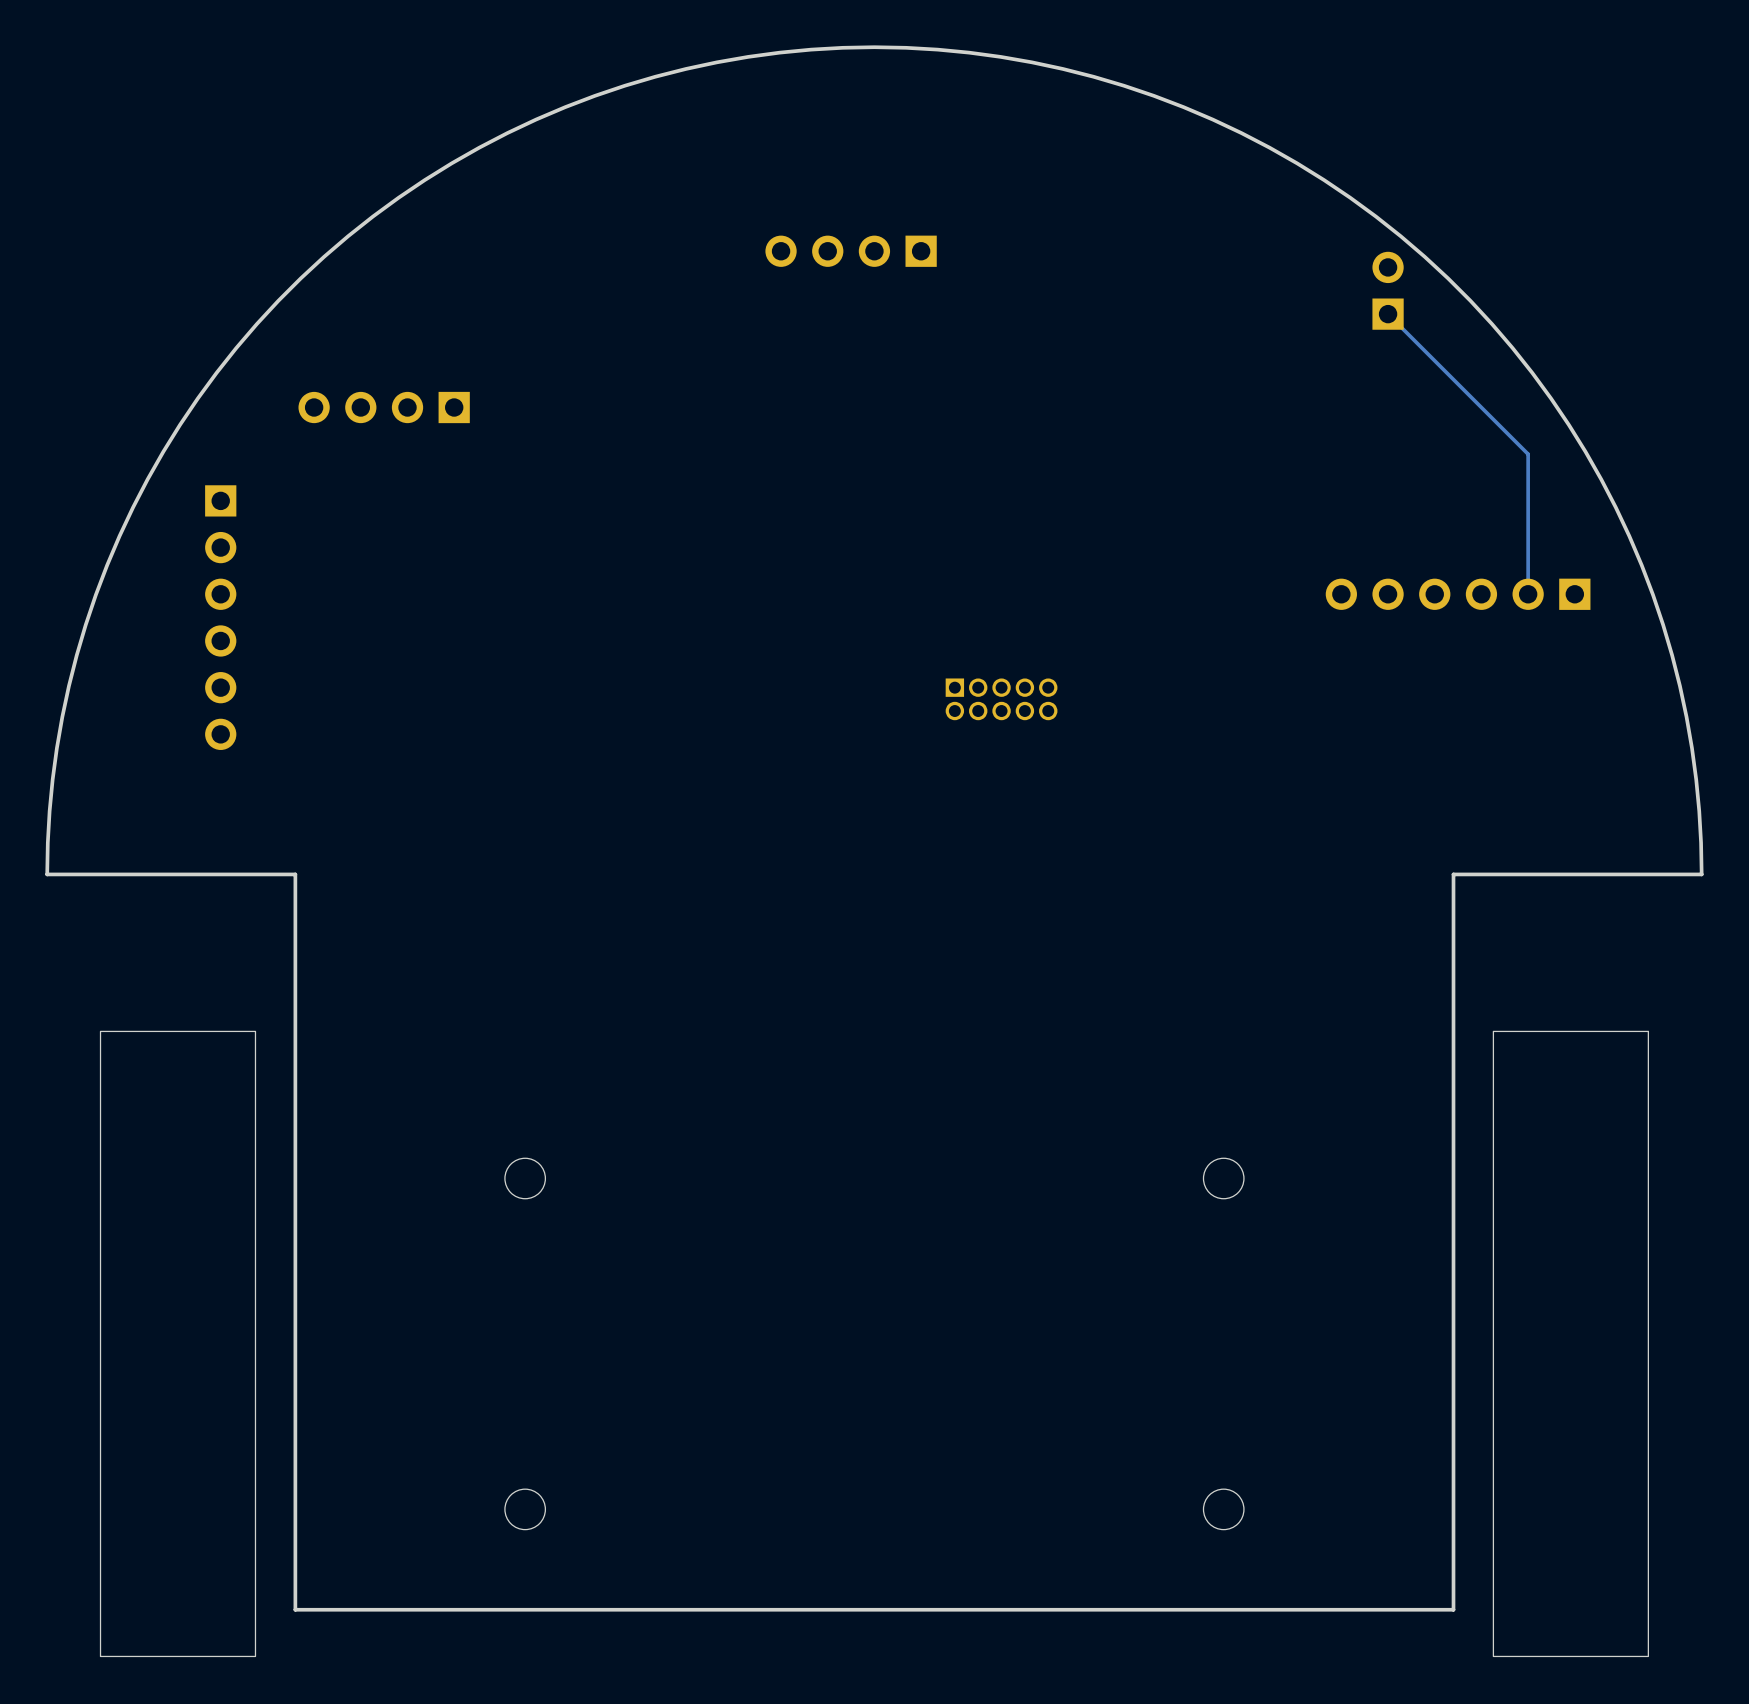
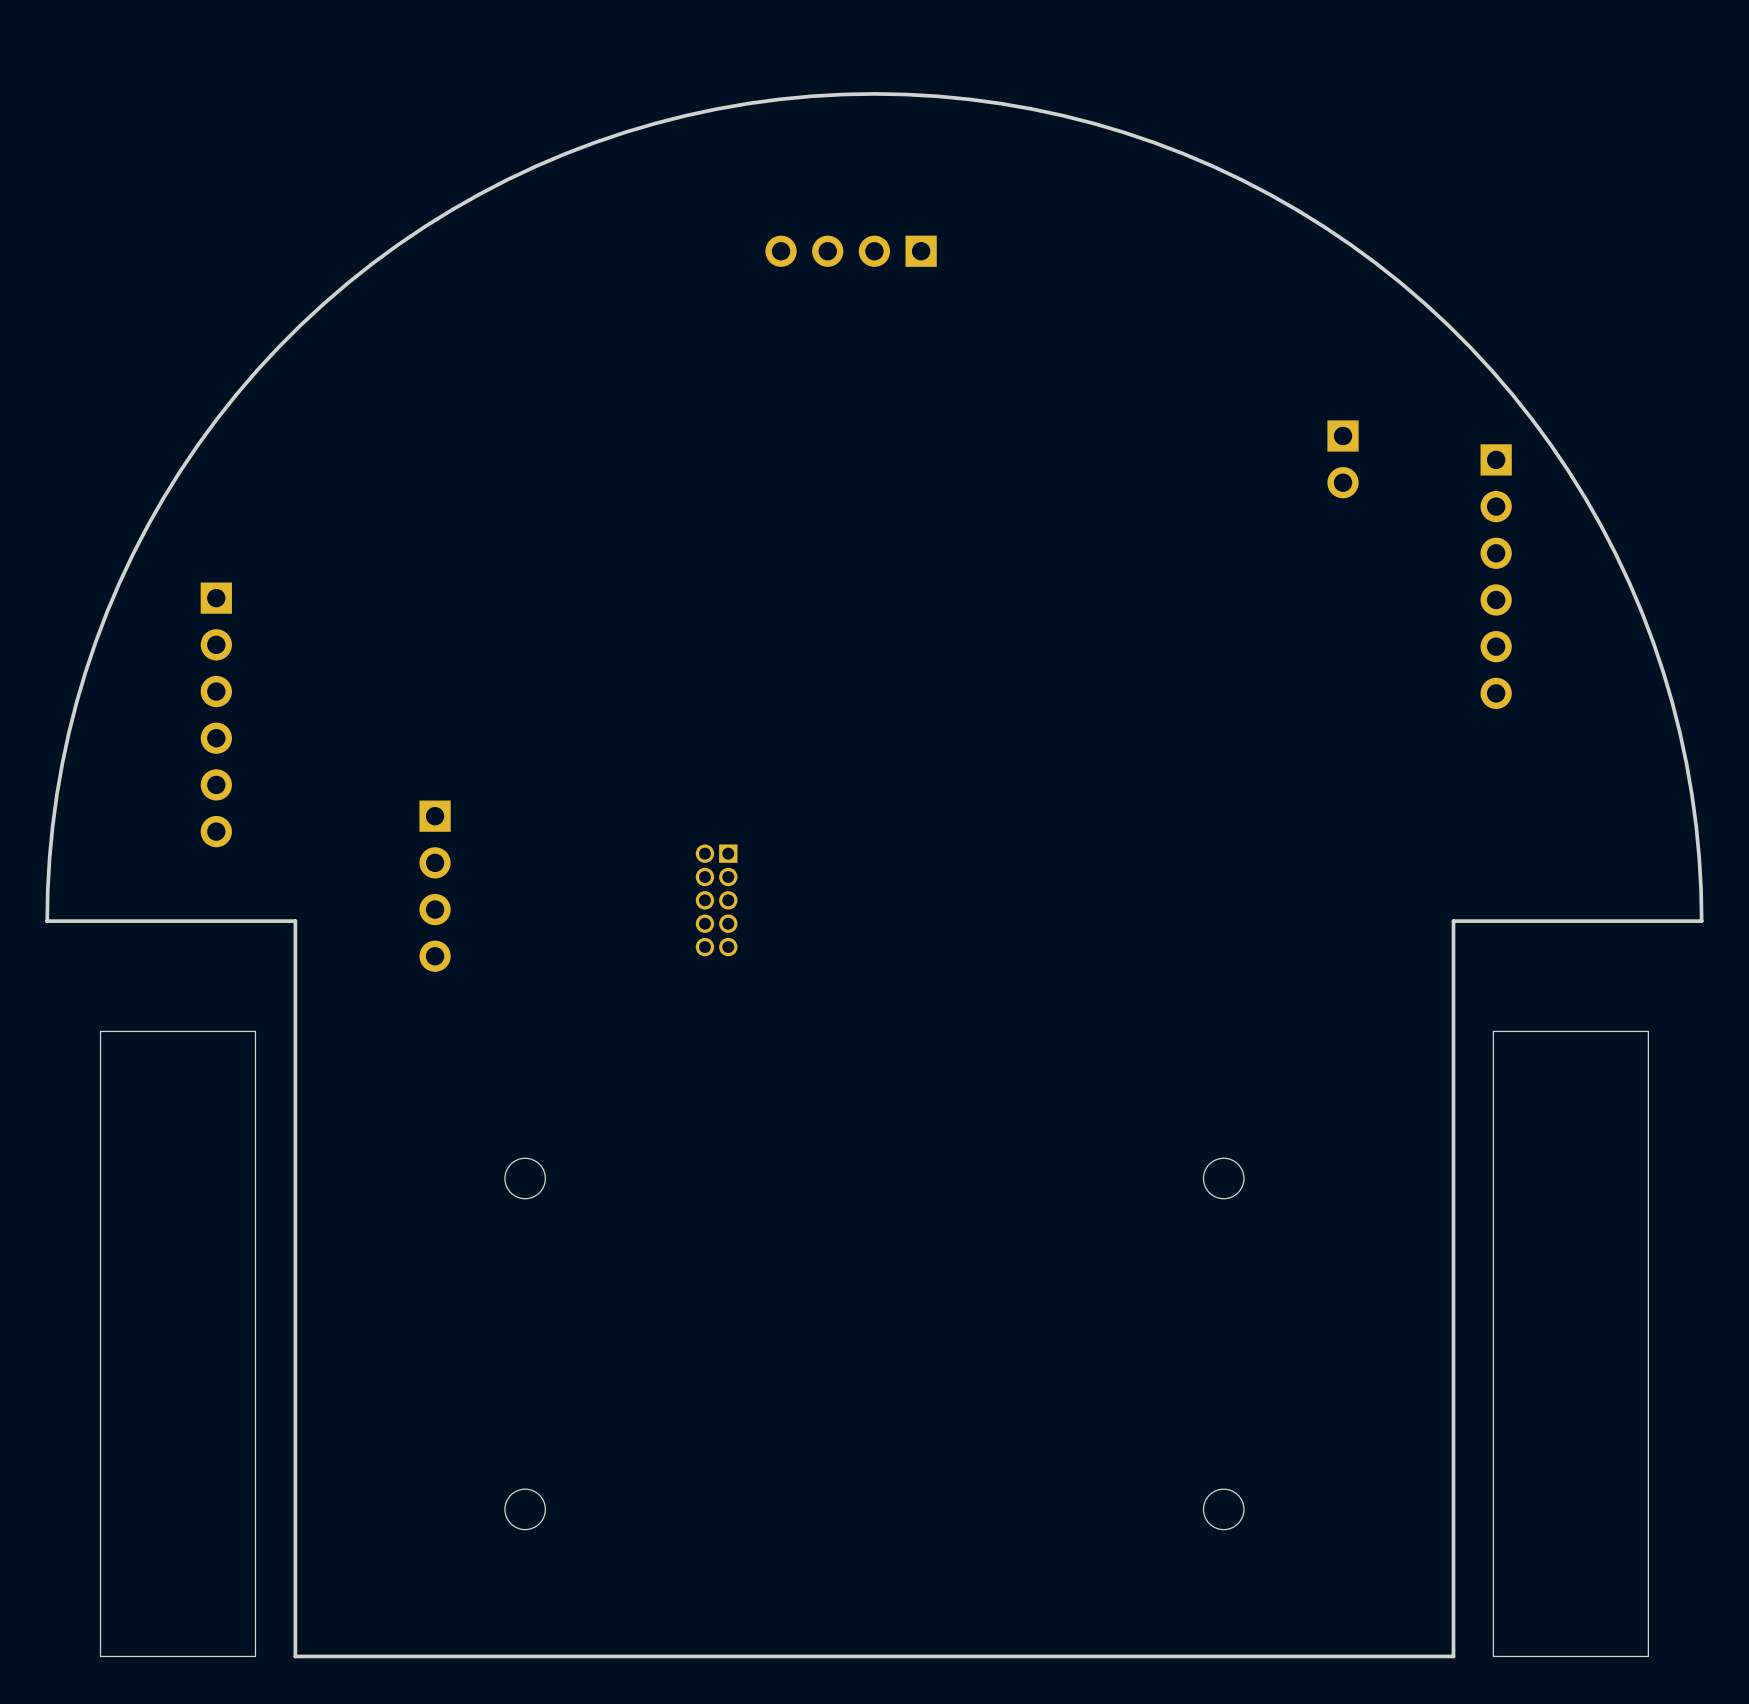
part rotation: 0° (1388, 290) -> 180° (1343, 459)
part position: (1388, 290) -> (1343, 459)
track: (1388, 314) (1528, 454) (1528, 594) -> none
part: (384, 407) -> none
part rotation: 0° (1458, 594) -> 90° counterclockwise (1496, 576)
part position: (220, 617) -> (216, 714)
part rotation: 0° (1001, 699) -> 90° clockwise (716, 900)
part position: (1001, 699) -> (716, 900)
part: none -> (435, 886)
board edge: (1453, 921) (1453, 874) (1701, 874) (1696, 779) (1686, 716) (1672, 655) (1652, 594) (1629, 536) (1601, 479) (1568, 424) (1512, 348) (1448, 278) (1375, 216) (1324, 180) (1269, 147) (1183, 107) (1093, 76) (1000, 56) (937, 49) (874, 47) (779, 52) (716, 62) (655, 76) (565, 107) (479, 147) (398, 197) (324, 256) (278, 300) (236, 348) (180, 424) (147, 479) (119, 536) (85, 624) (68, 685) (56, 748) (49, 811) (47, 874) (295, 874) (295, 921) -> (1453, 921) (1701, 921) (1699, 857) (1691, 794) (1679, 732) (1663, 671) (1641, 611) (1615, 554) (1585, 498) (1551, 445) (1492, 370) (1424, 303) (1350, 244) (1269, 194) (1212, 166) (1154, 142) (1062, 115) (969, 99) (874, 93) (811, 96) (748, 103) (655, 123) (565, 153) (479, 194) (398, 244) (324, 303) (256, 370) (197, 445) (163, 498) (133, 554) (107, 611) (85, 671) (68, 732) (56, 794) (49, 857) (47, 921) (295, 921)
board edge: (1453, 1609) (295, 1609) -> (1453, 1609) (1453, 1656) (295, 1656) (295, 1609)

